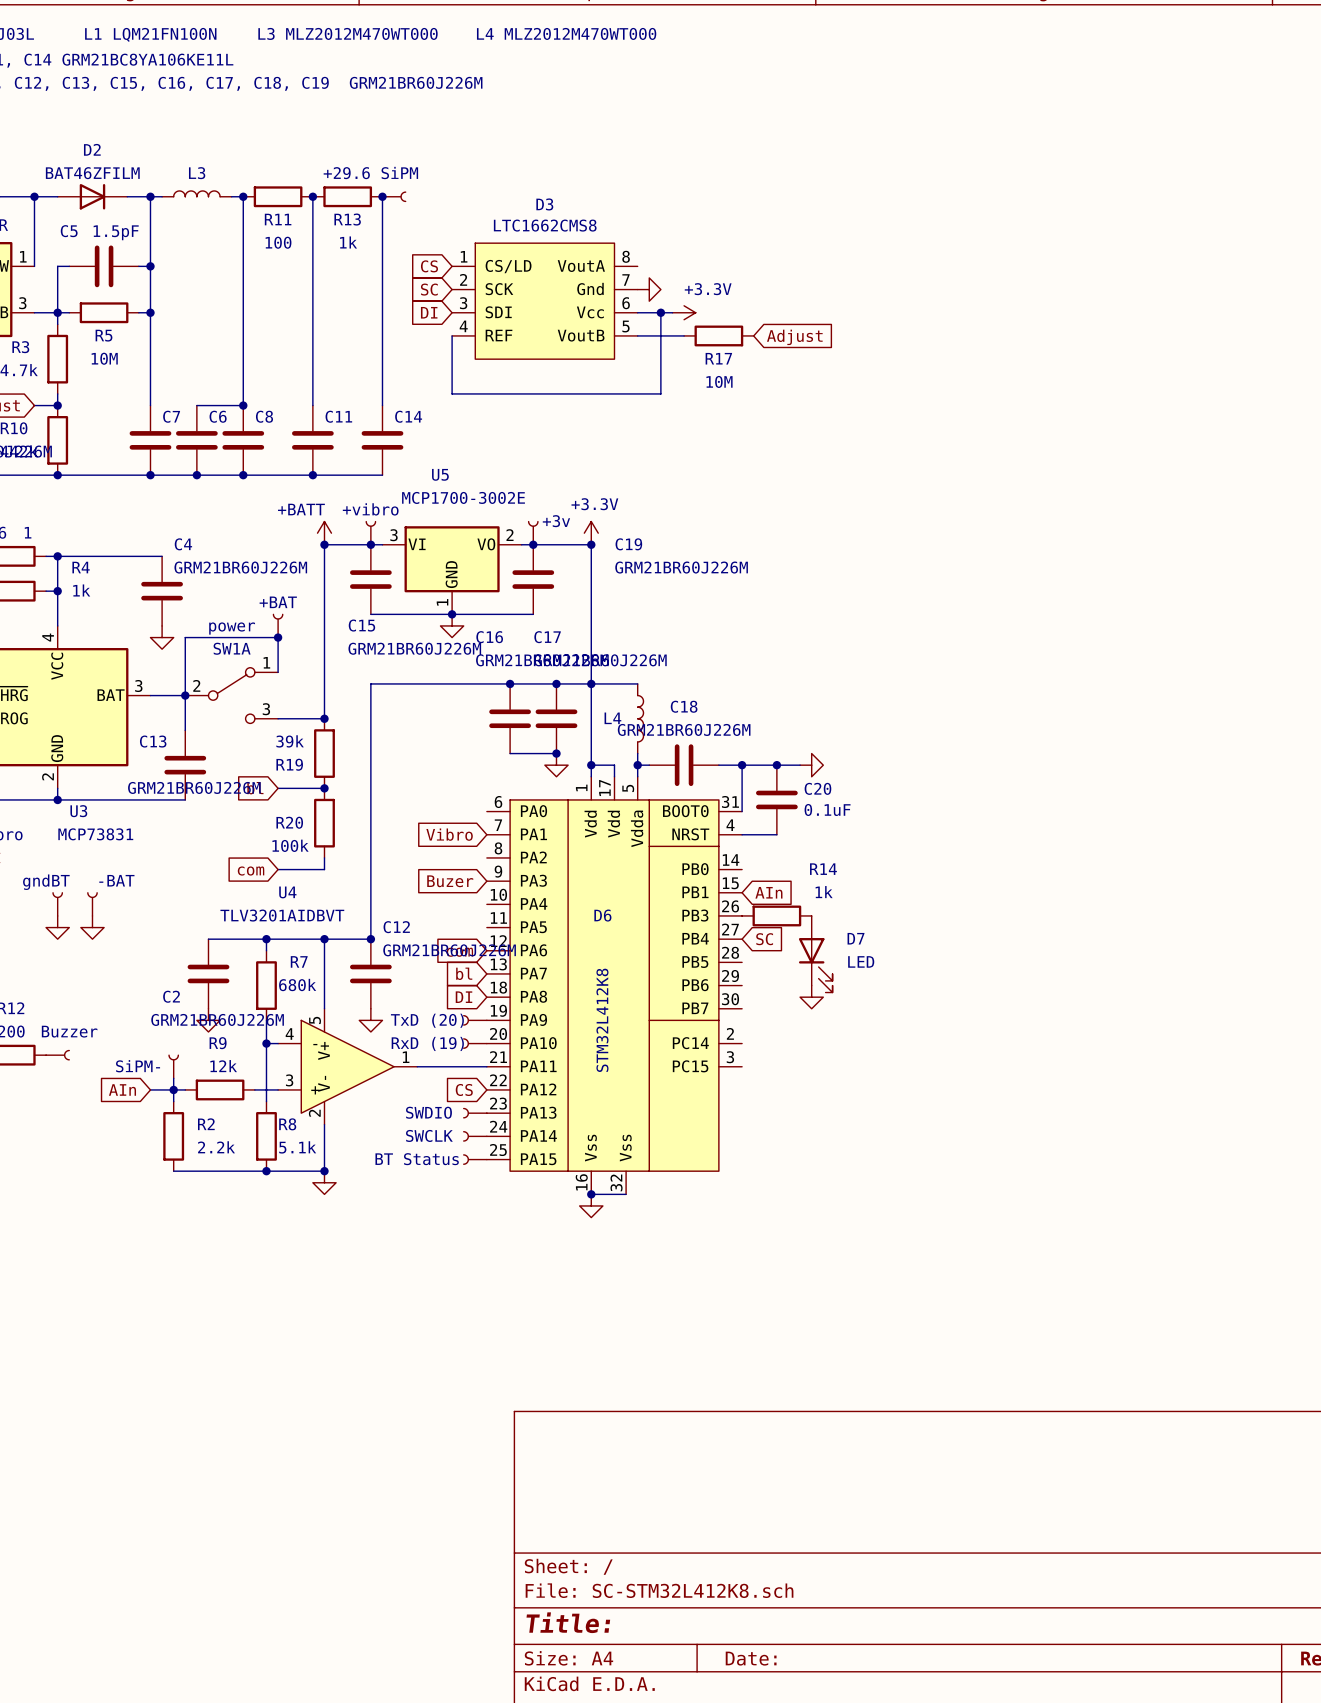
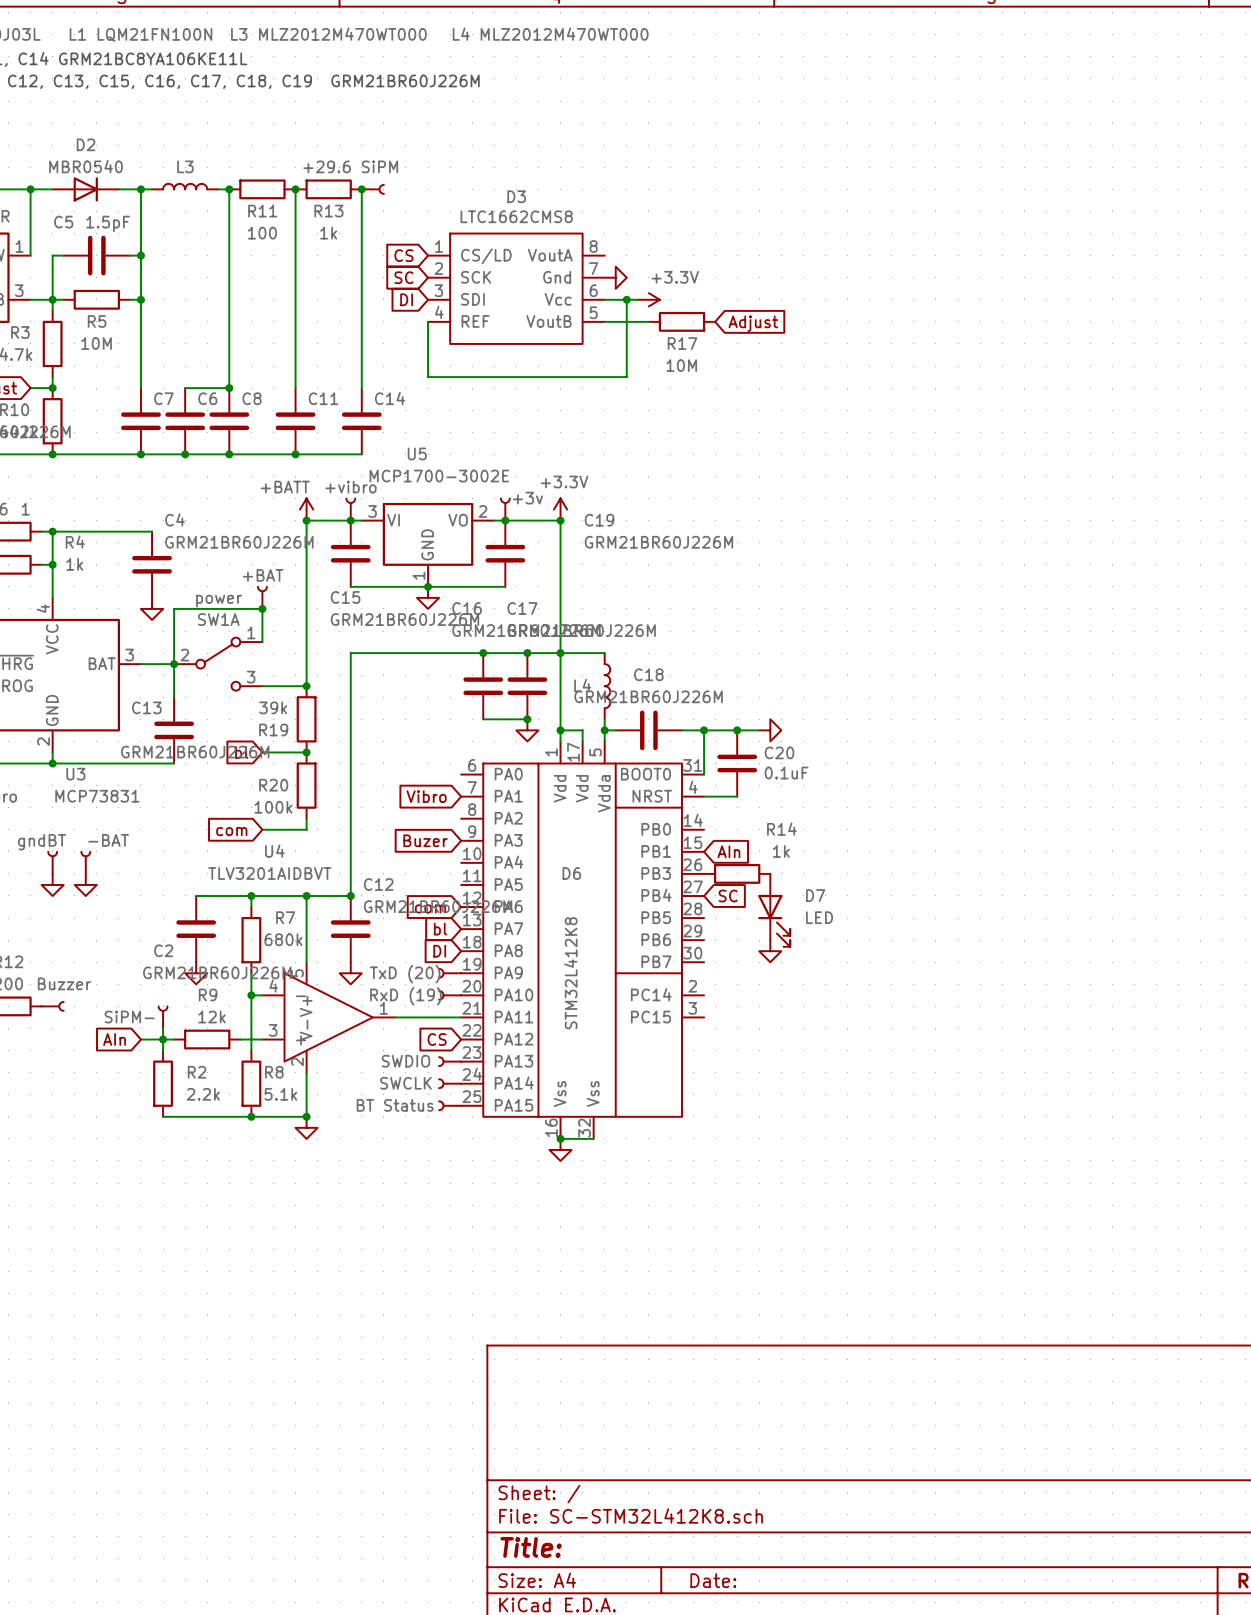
D2 value: BAT46ZFILM (92, 173) -> MBR0540 (86, 166)

